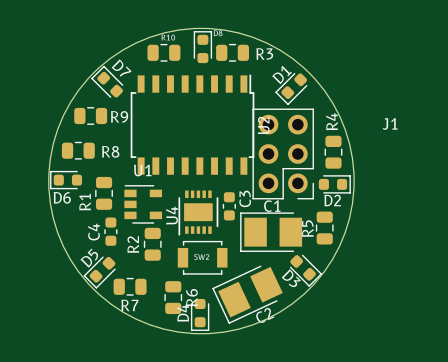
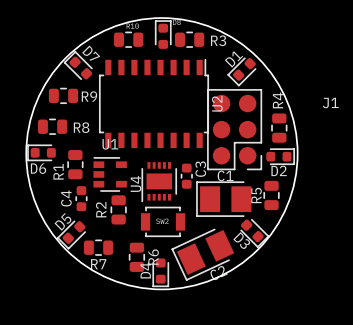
J1 footprint: [252, 108, 314, 200] -> [207, 89, 262, 171]

